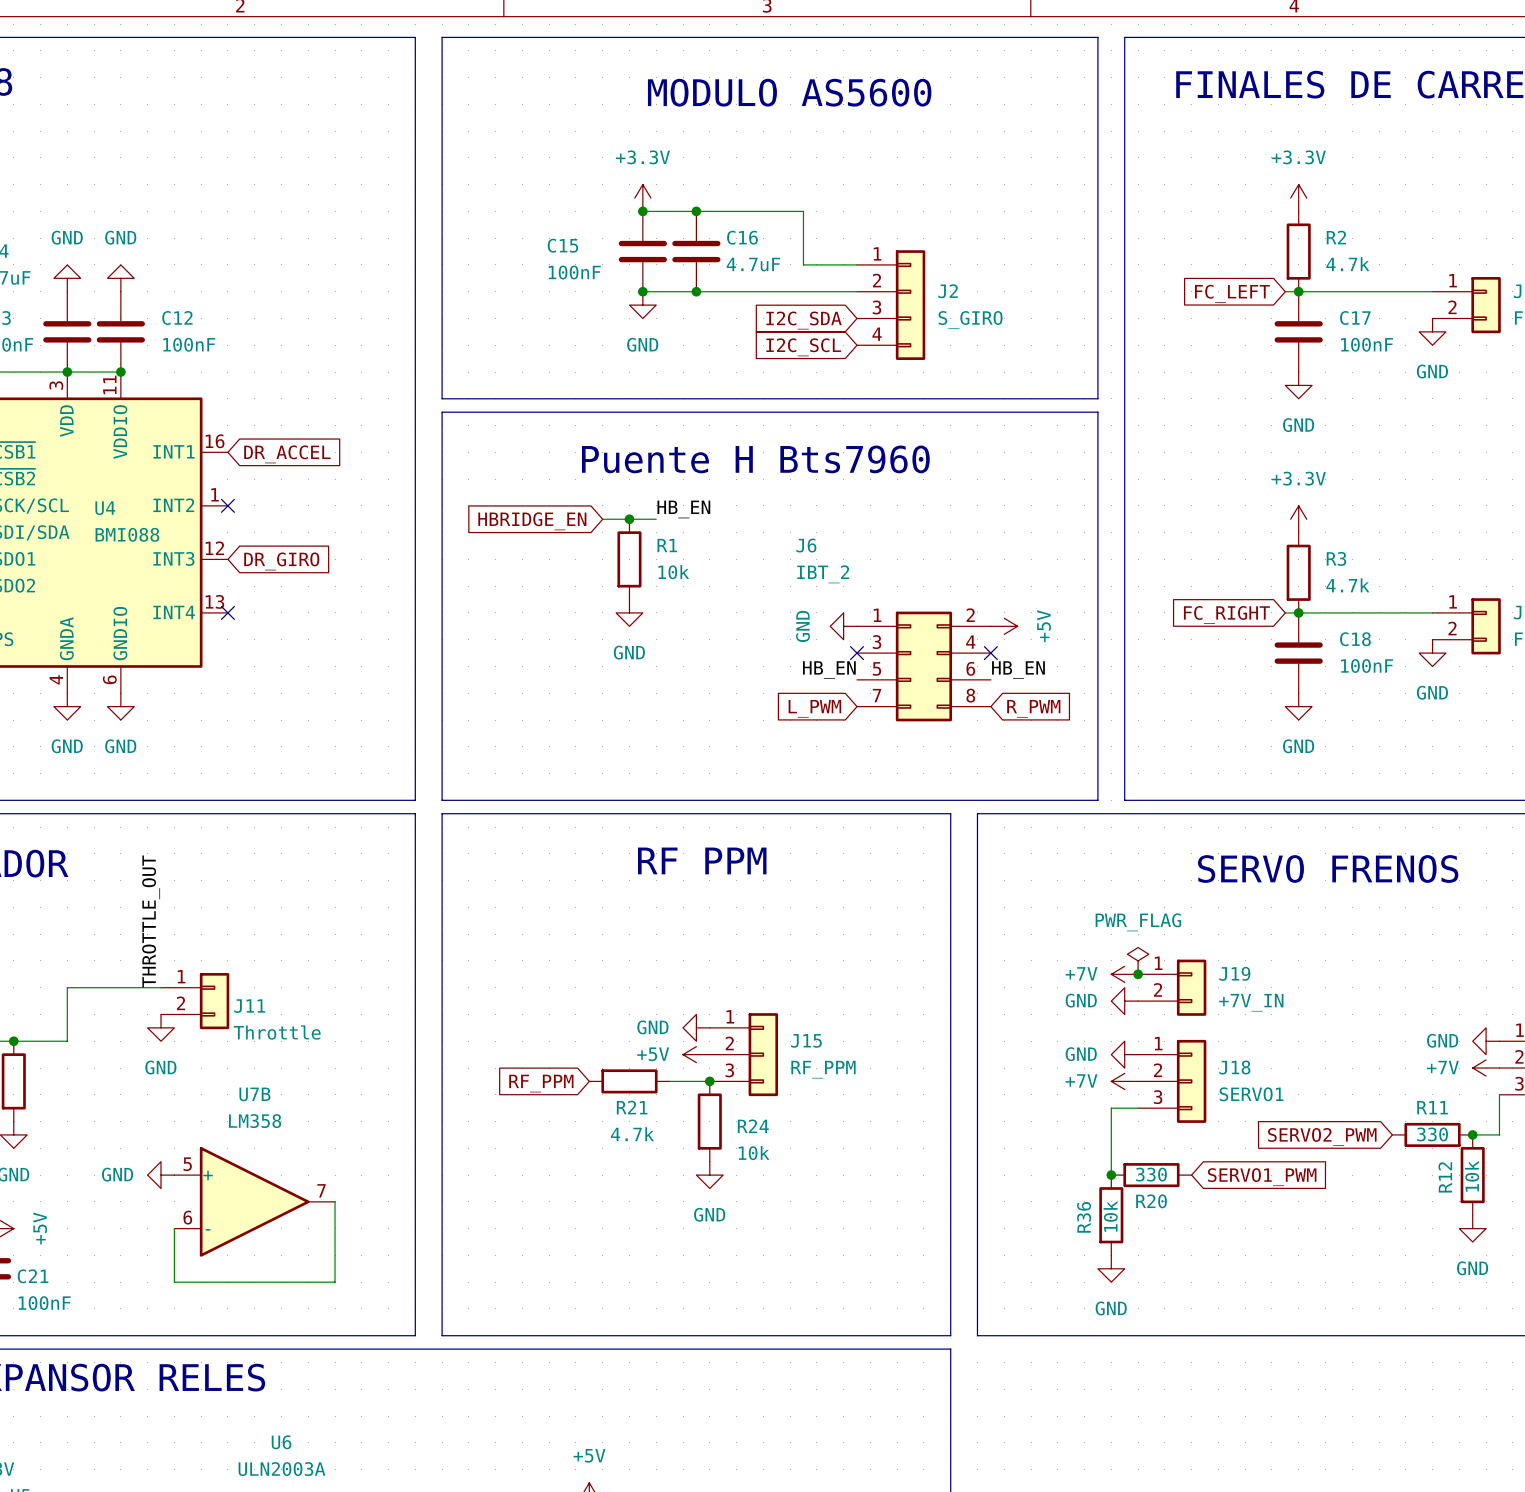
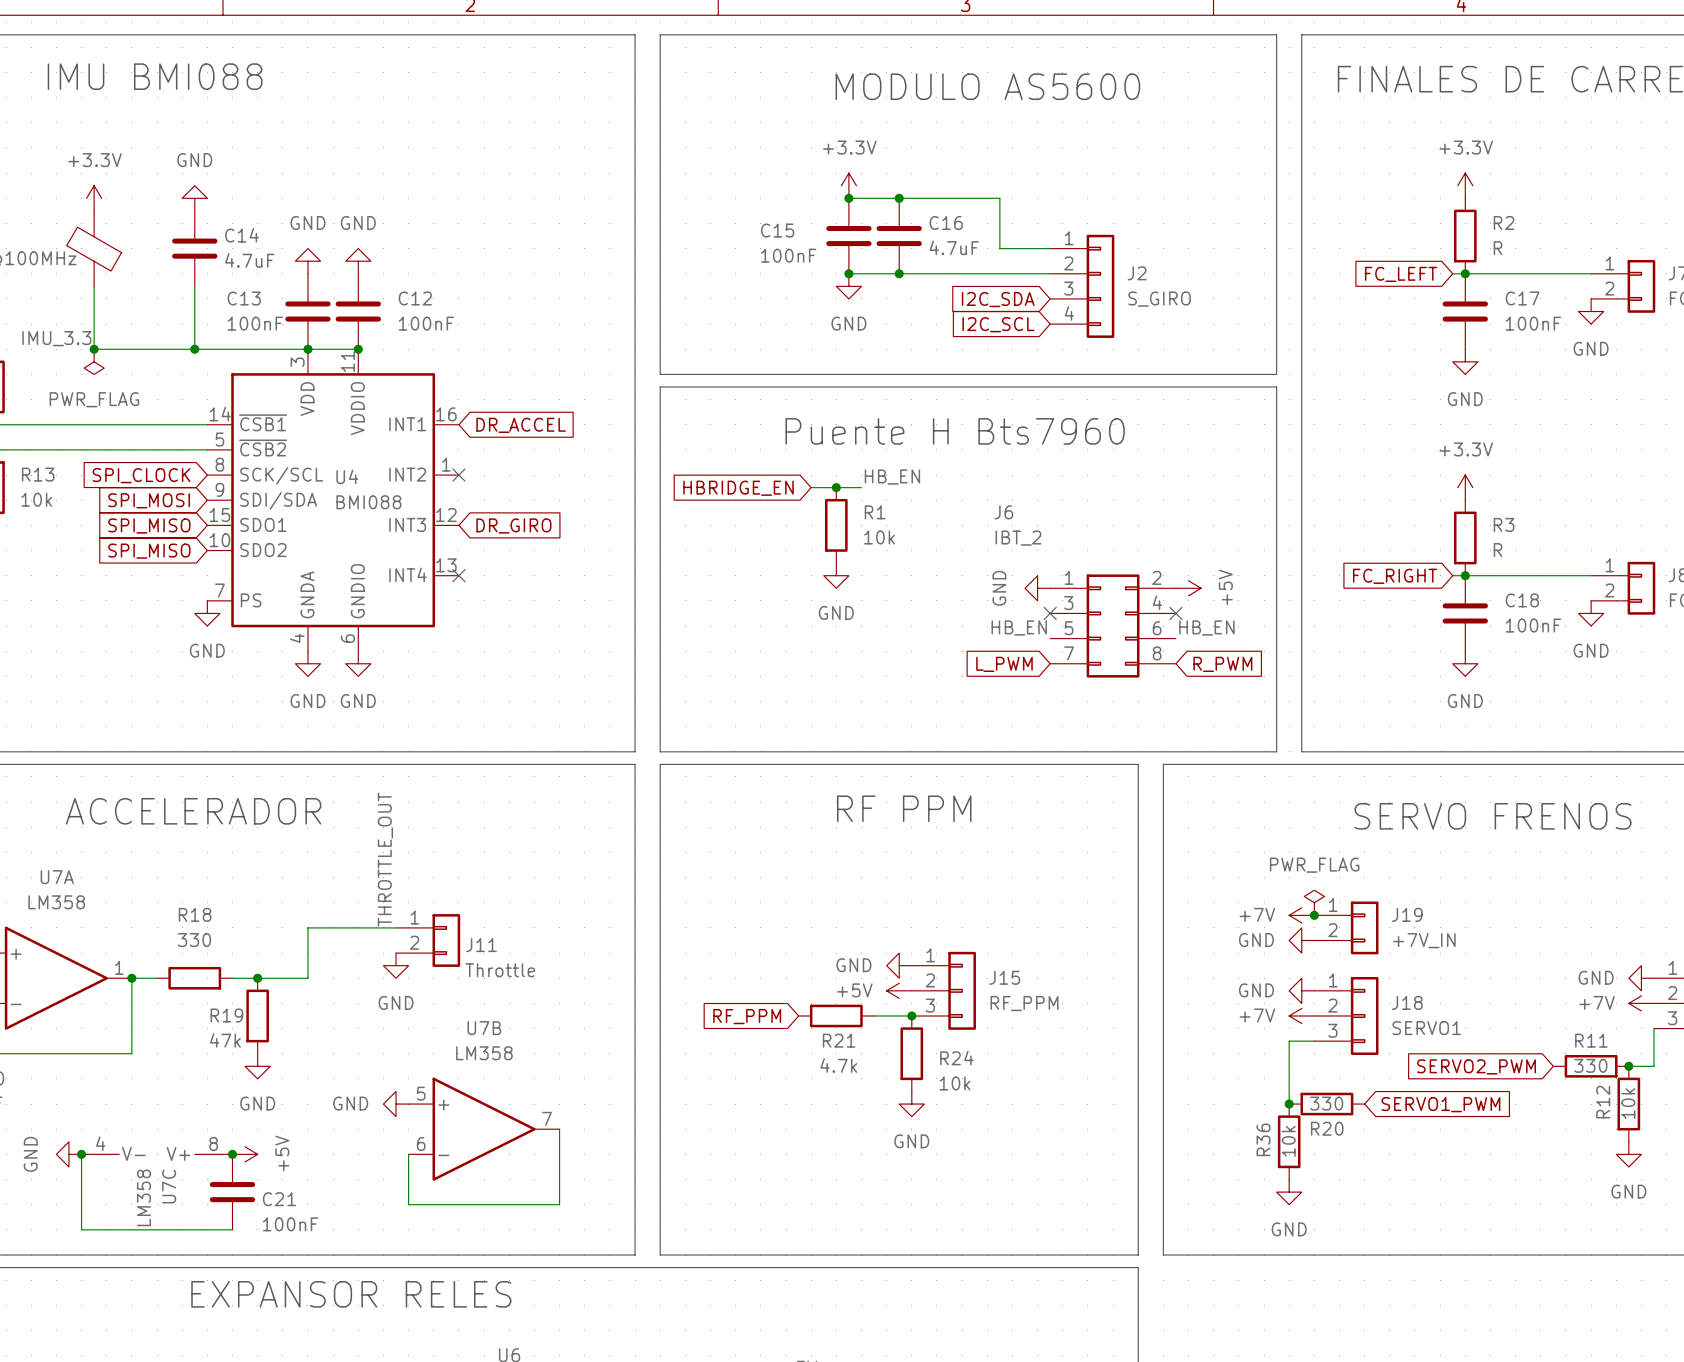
R2 value: 4.7k (1347, 264) -> R (1498, 248)
R3 value: 4.7k (1347, 585) -> R (1498, 550)

